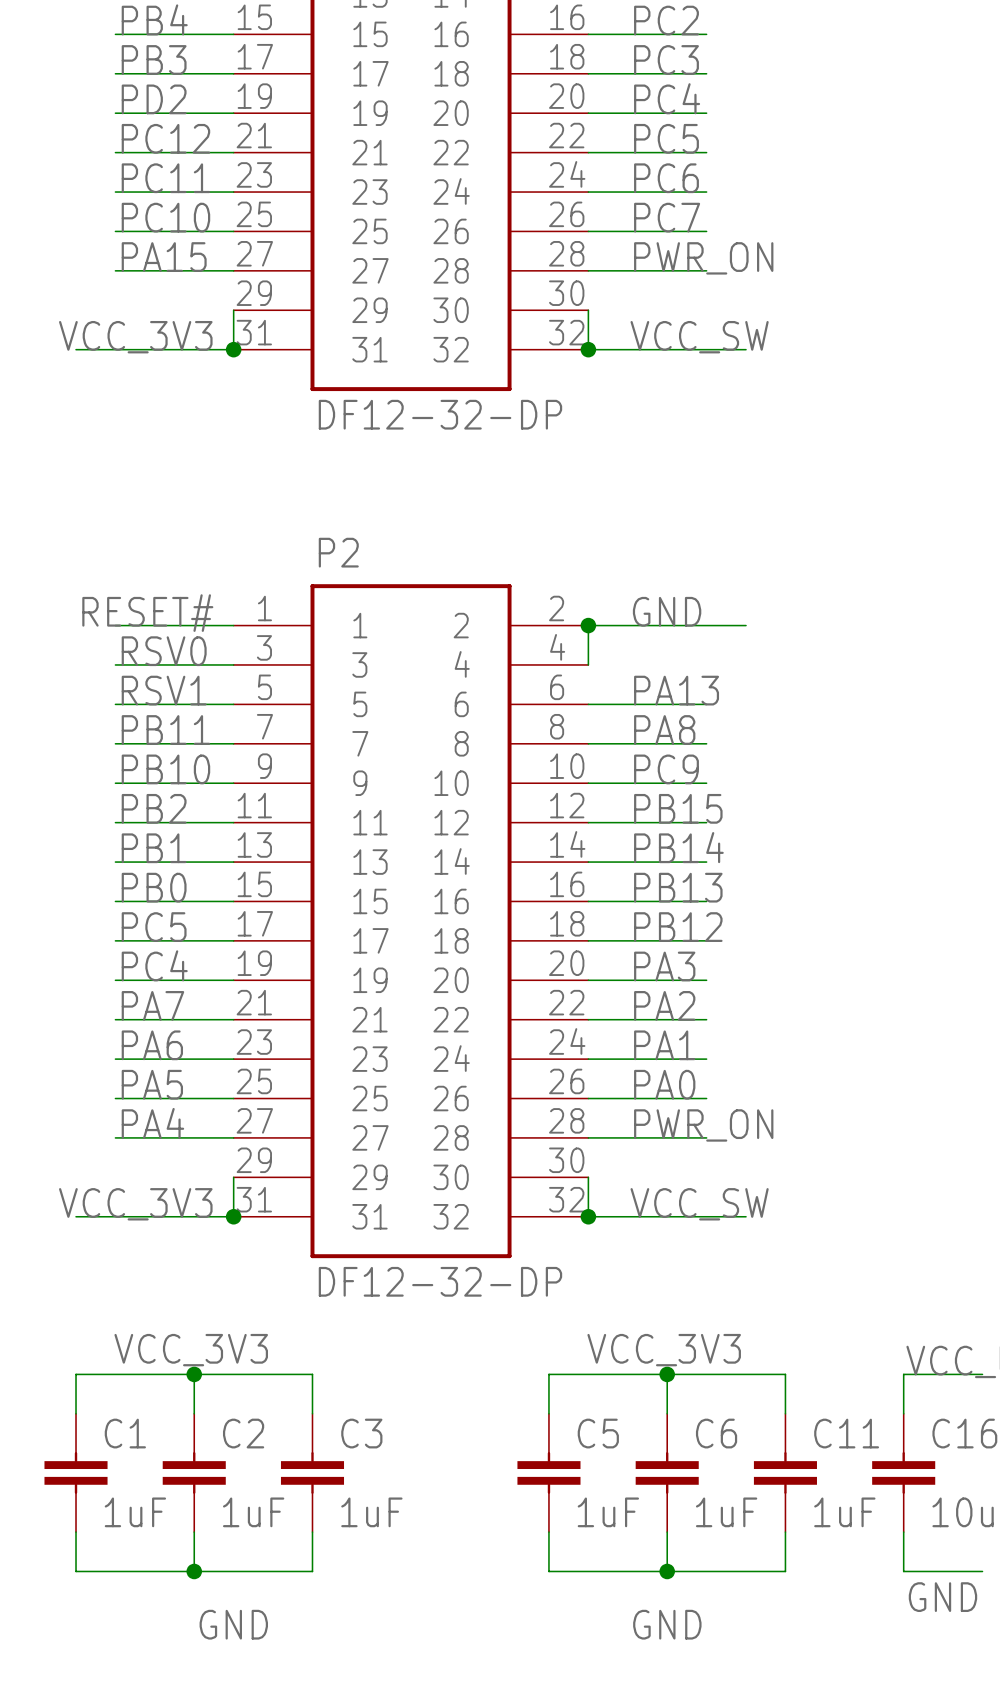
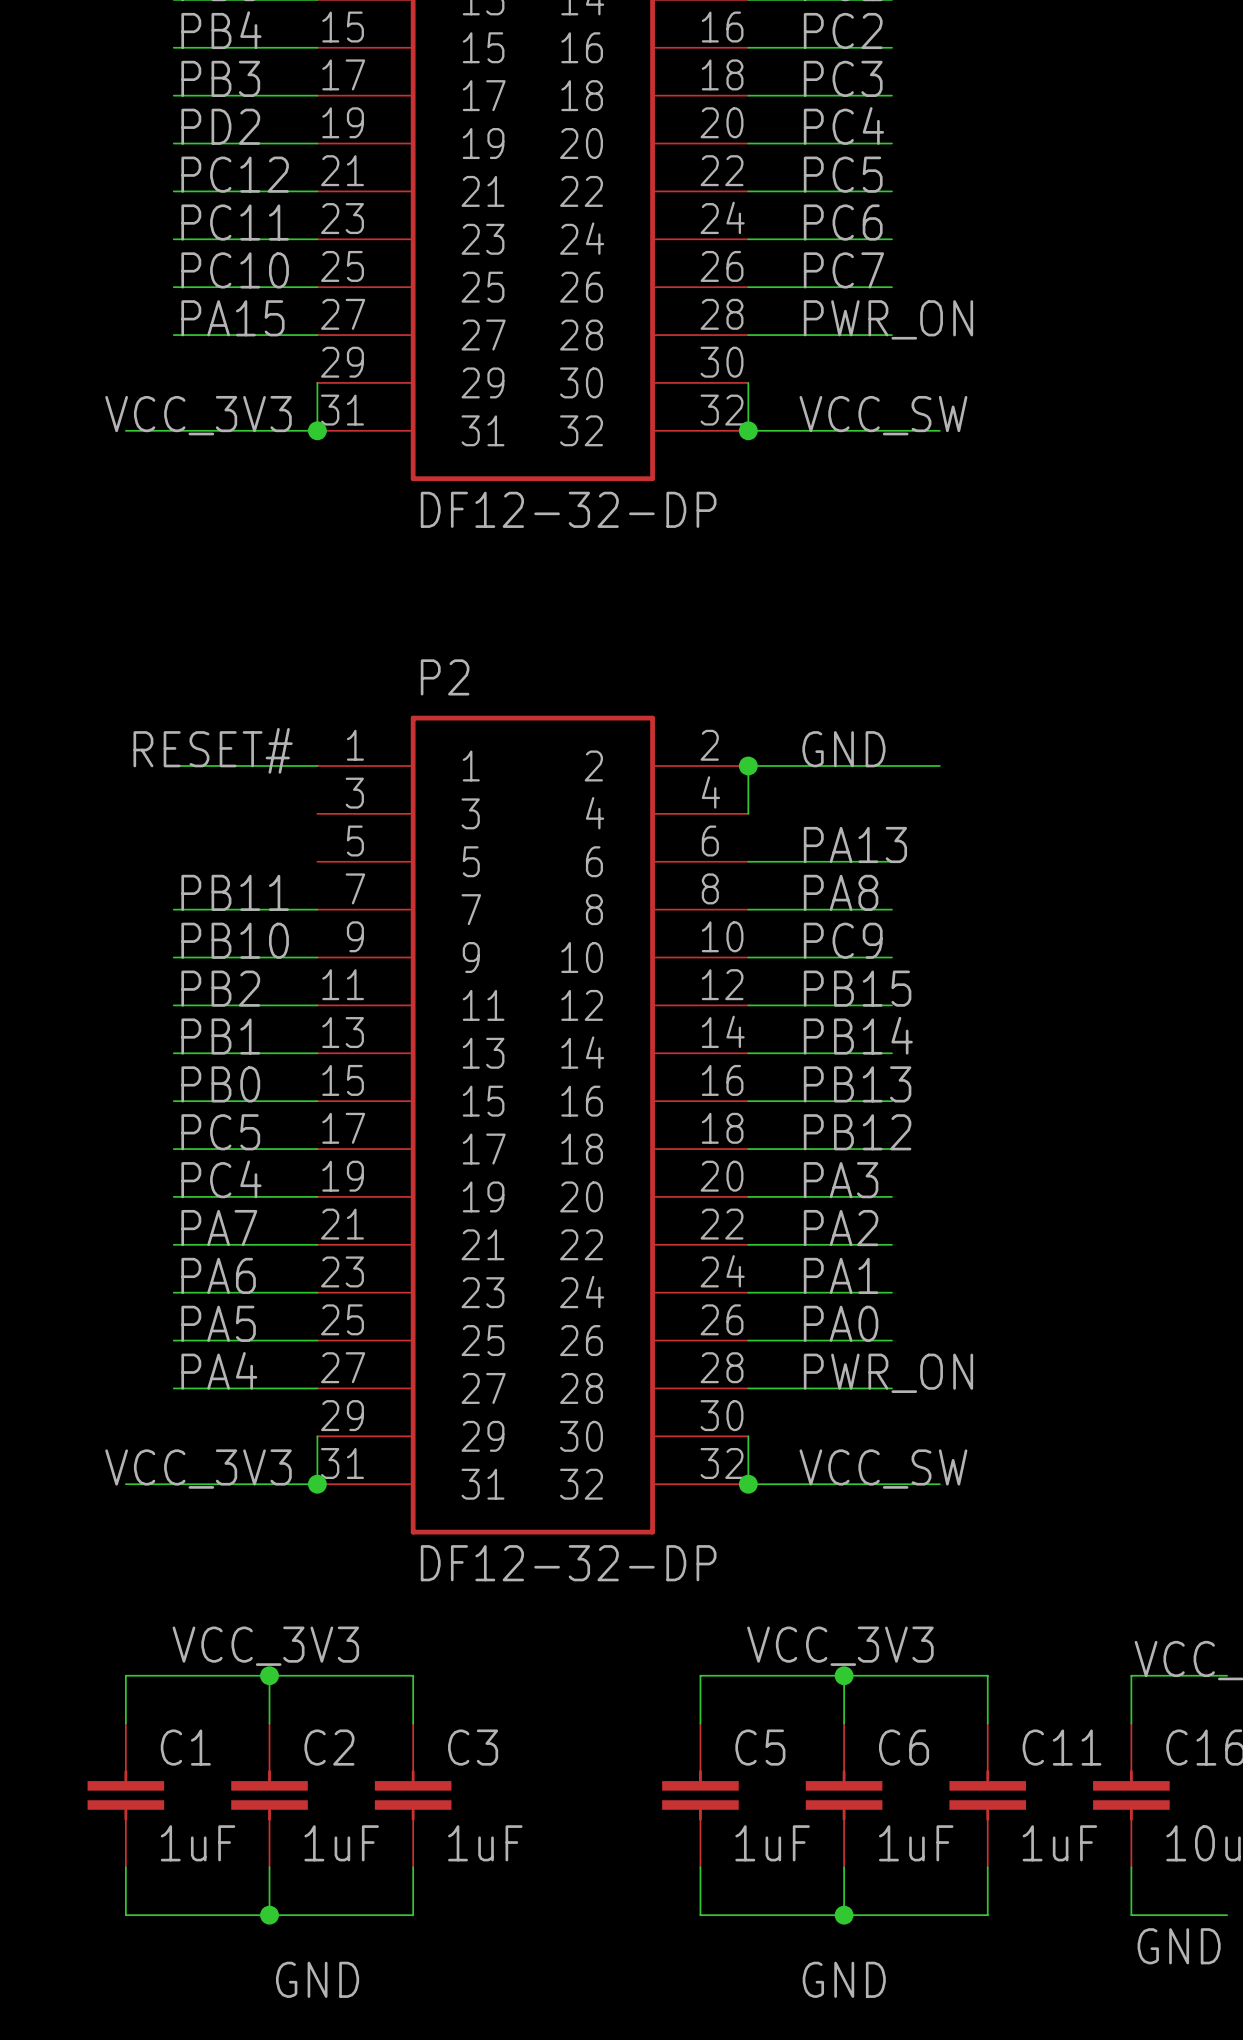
label: RSV0 (164, 651) -> none
wire: (115, 664) (233, 664) -> none
label: RSV1 (164, 690) -> none
wire: (115, 704) (233, 704) -> none

